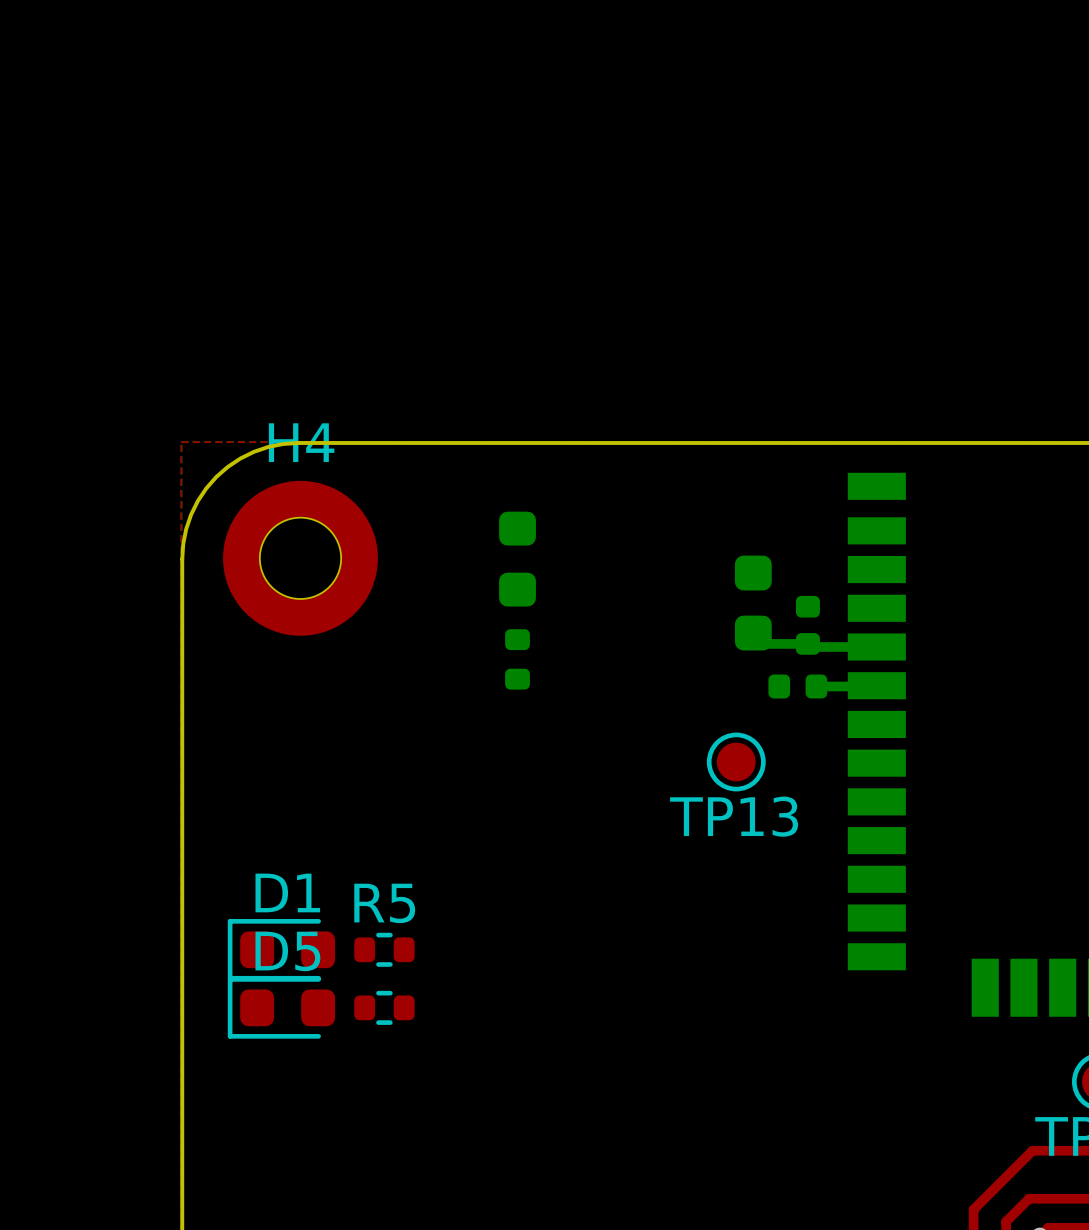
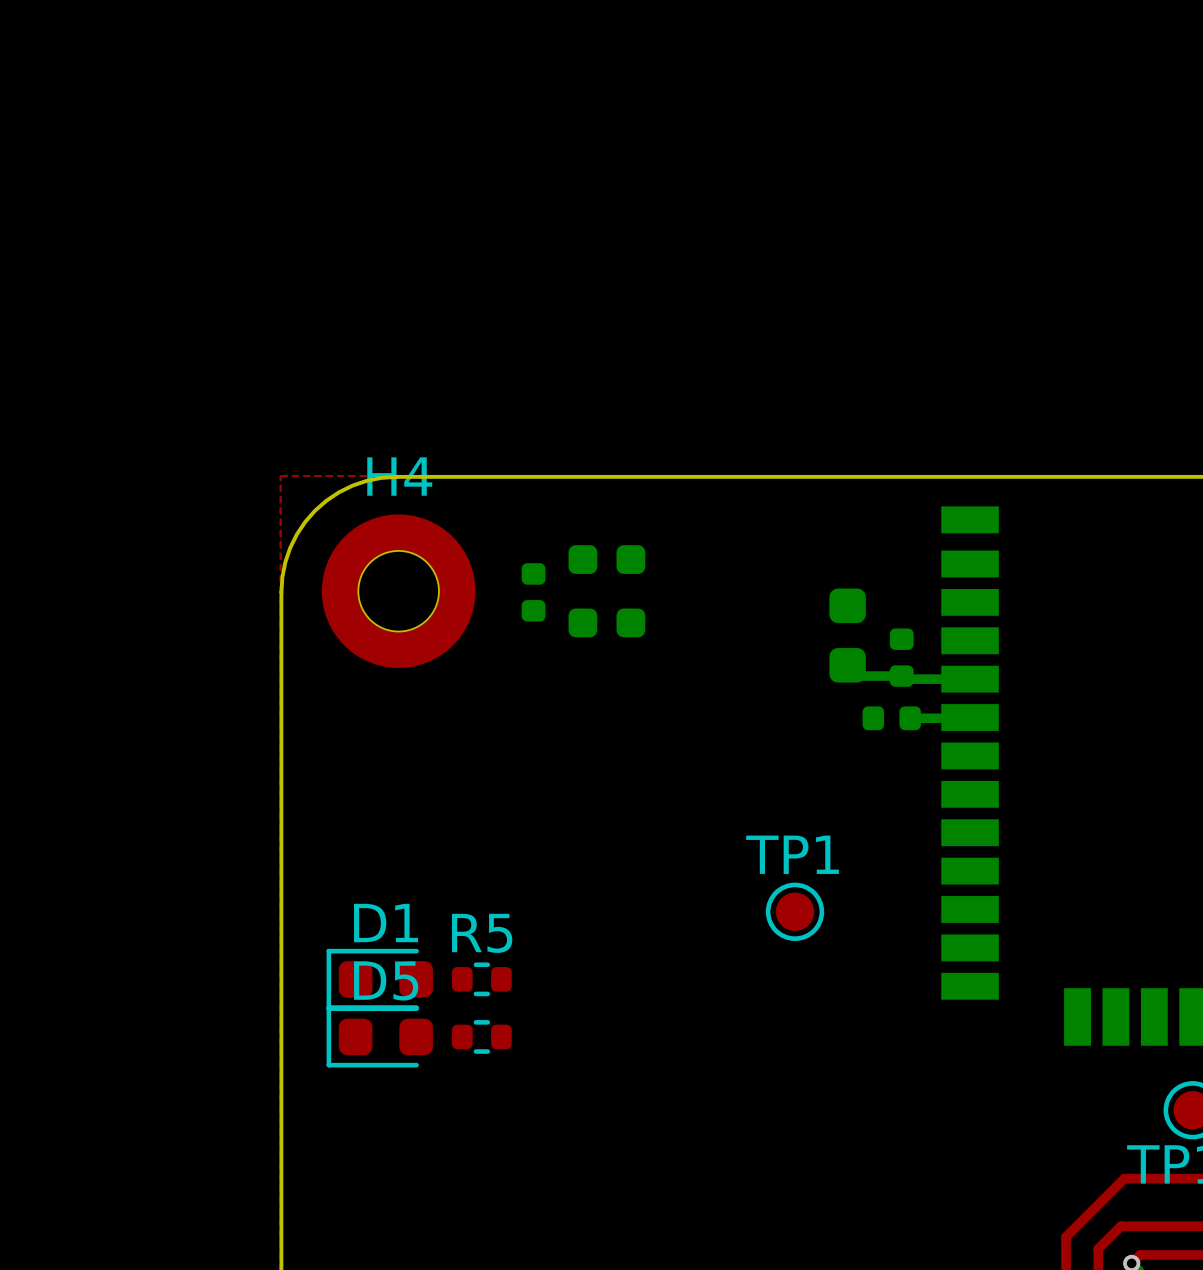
part footprint: [499, 511, 536, 607] -> [568, 545, 646, 638]
part: none -> (533, 592)
part: (517, 659) -> none
TP13: (736, 762) -> none
TP1: none -> (795, 911)

